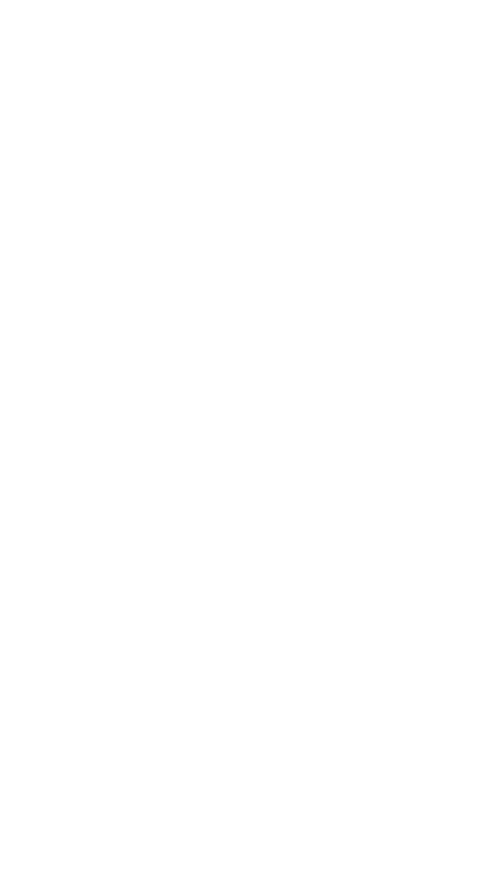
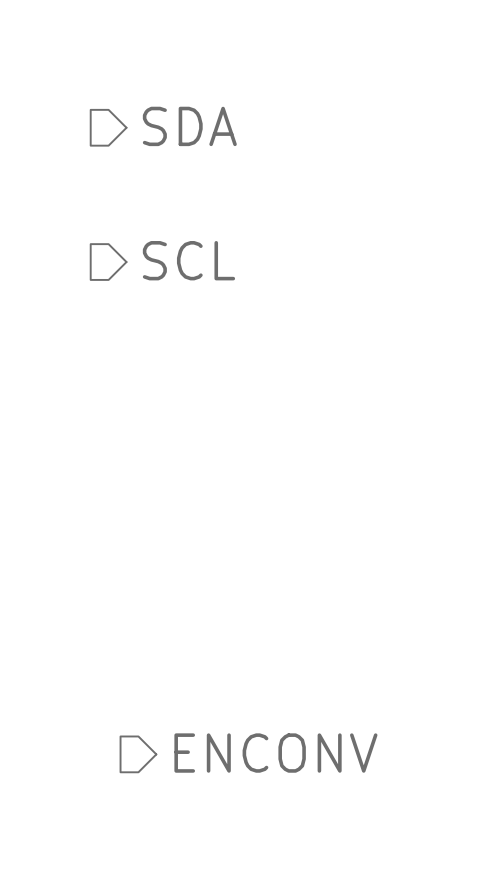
hierarchical label: none -> SDA (189, 126)
hierarchical label: none -> SCL (188, 260)
hierarchical label: none -> ENCONV (275, 753)

